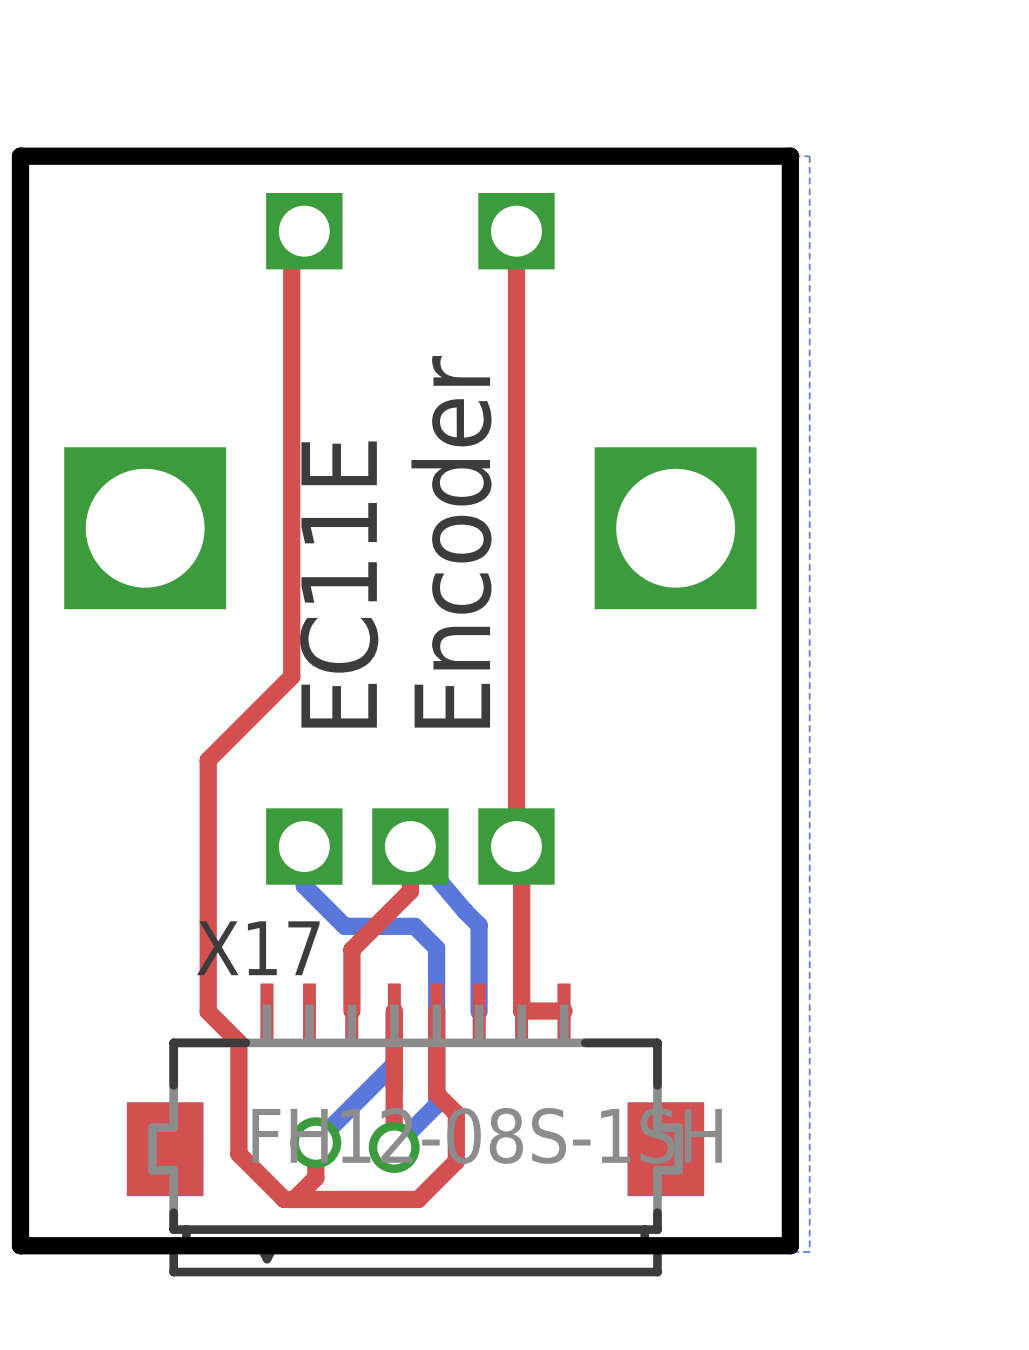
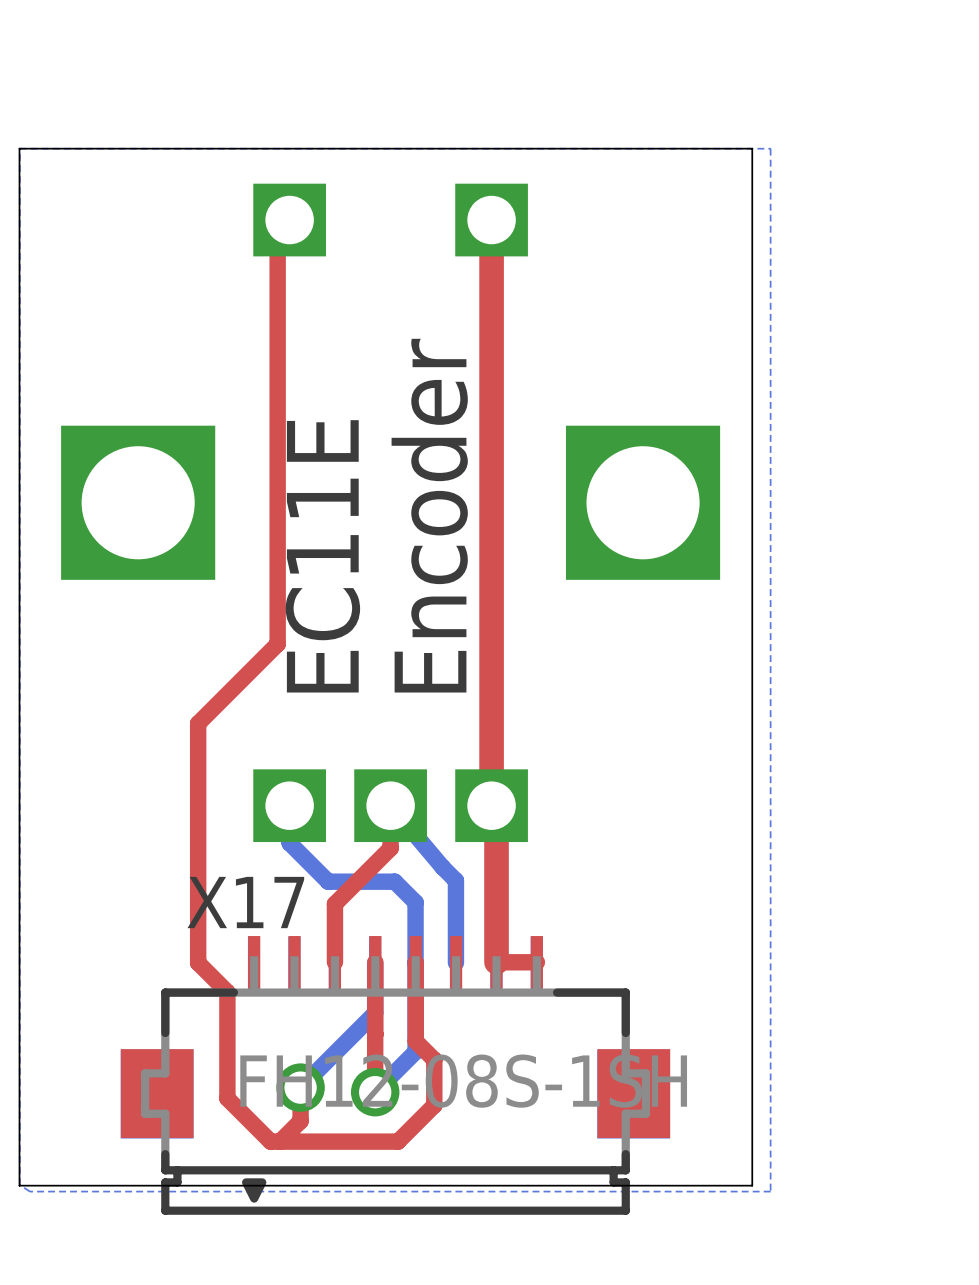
board edge width: thick (20, 156) (20, 1245) (790, 1245) (790, 156) (20, 156) -> thin (19, 148) (19, 1185) (752, 1185) (752, 148) (19, 148)
top track width: thin (516, 231) (516, 846) (521, 851) (521, 1011) -> thick (491, 220) (491, 805) (496, 810) (496, 962)

